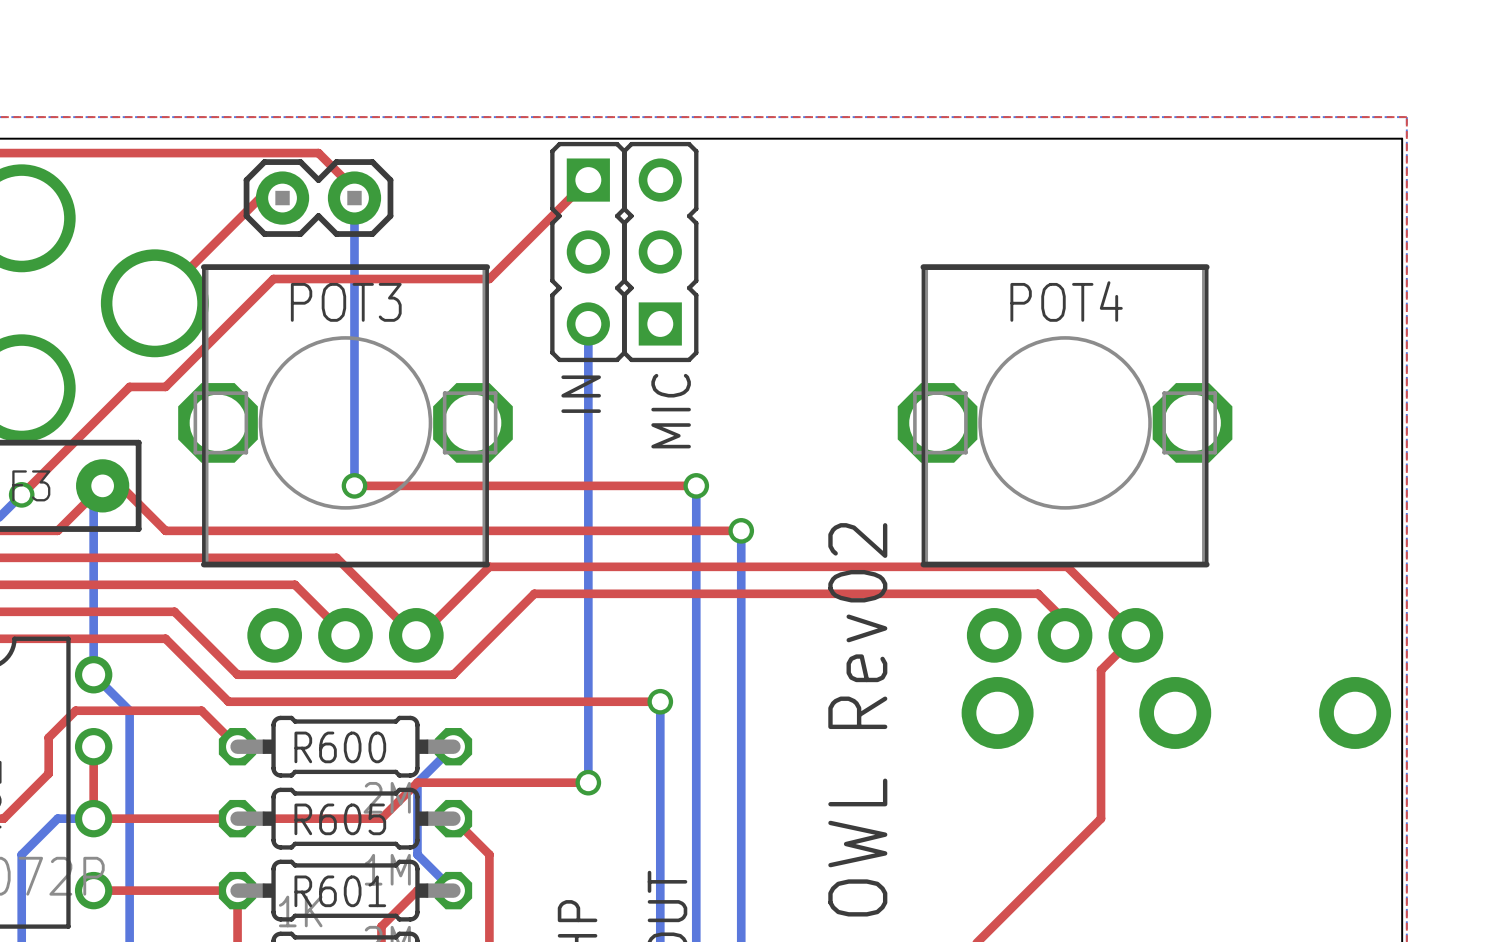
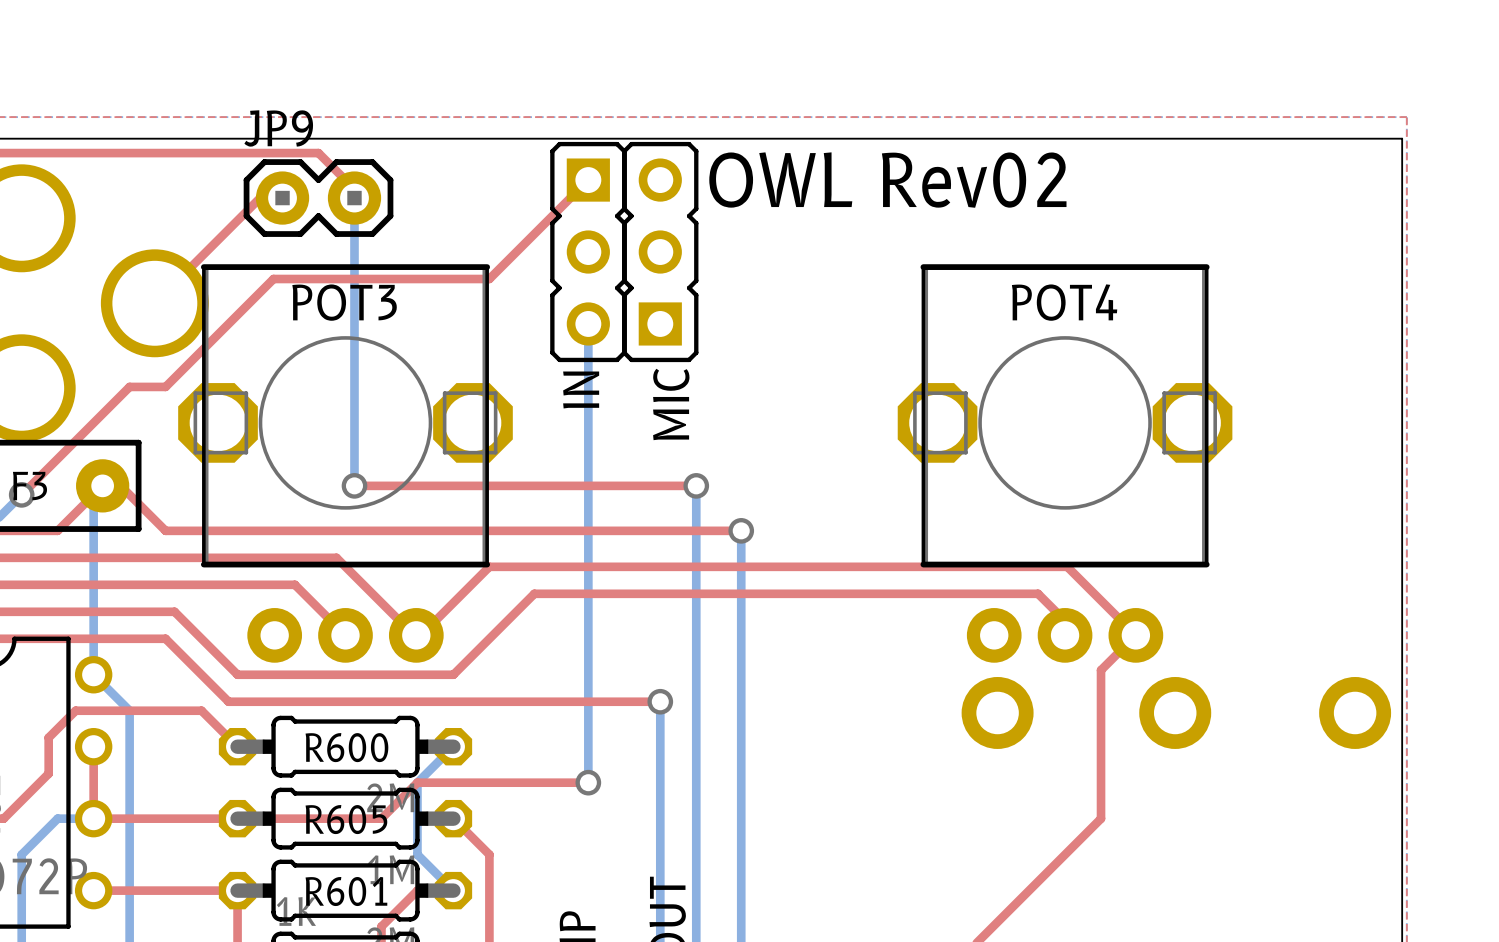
JP9 name: none -> JP9 (278, 128)
text: none -> OWL Rev02 (887, 180)
text: OWL Rev02 (857, 719) -> none

